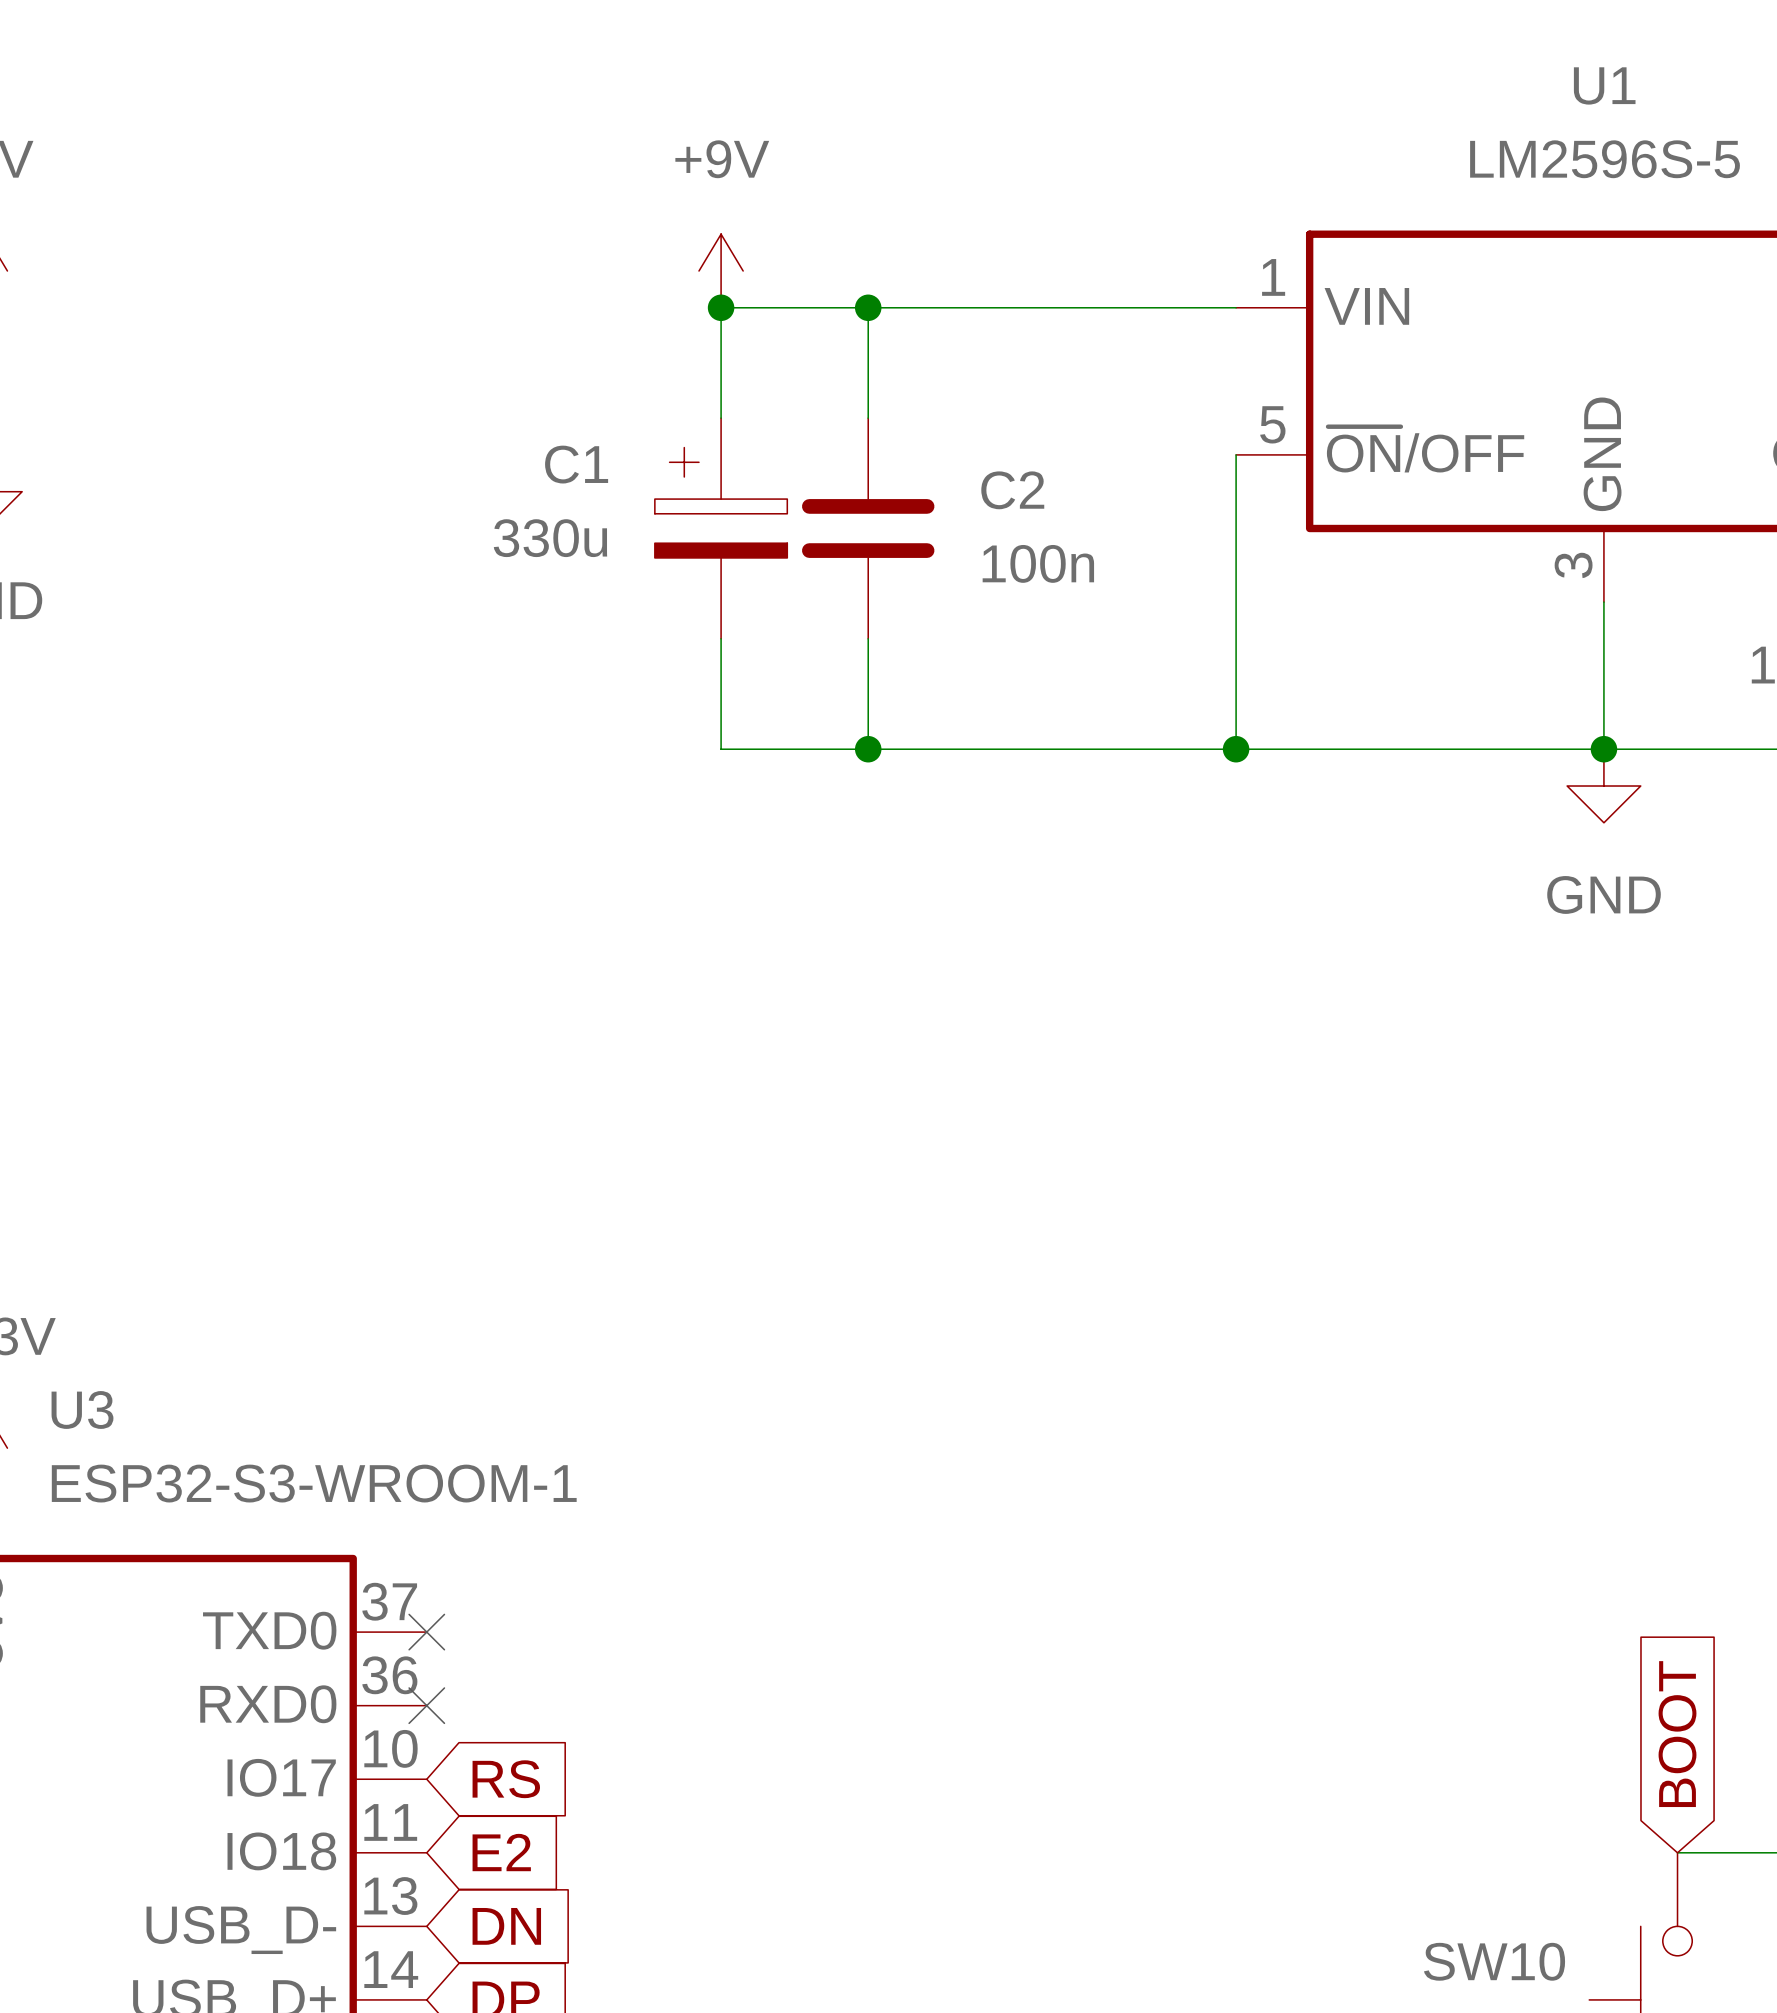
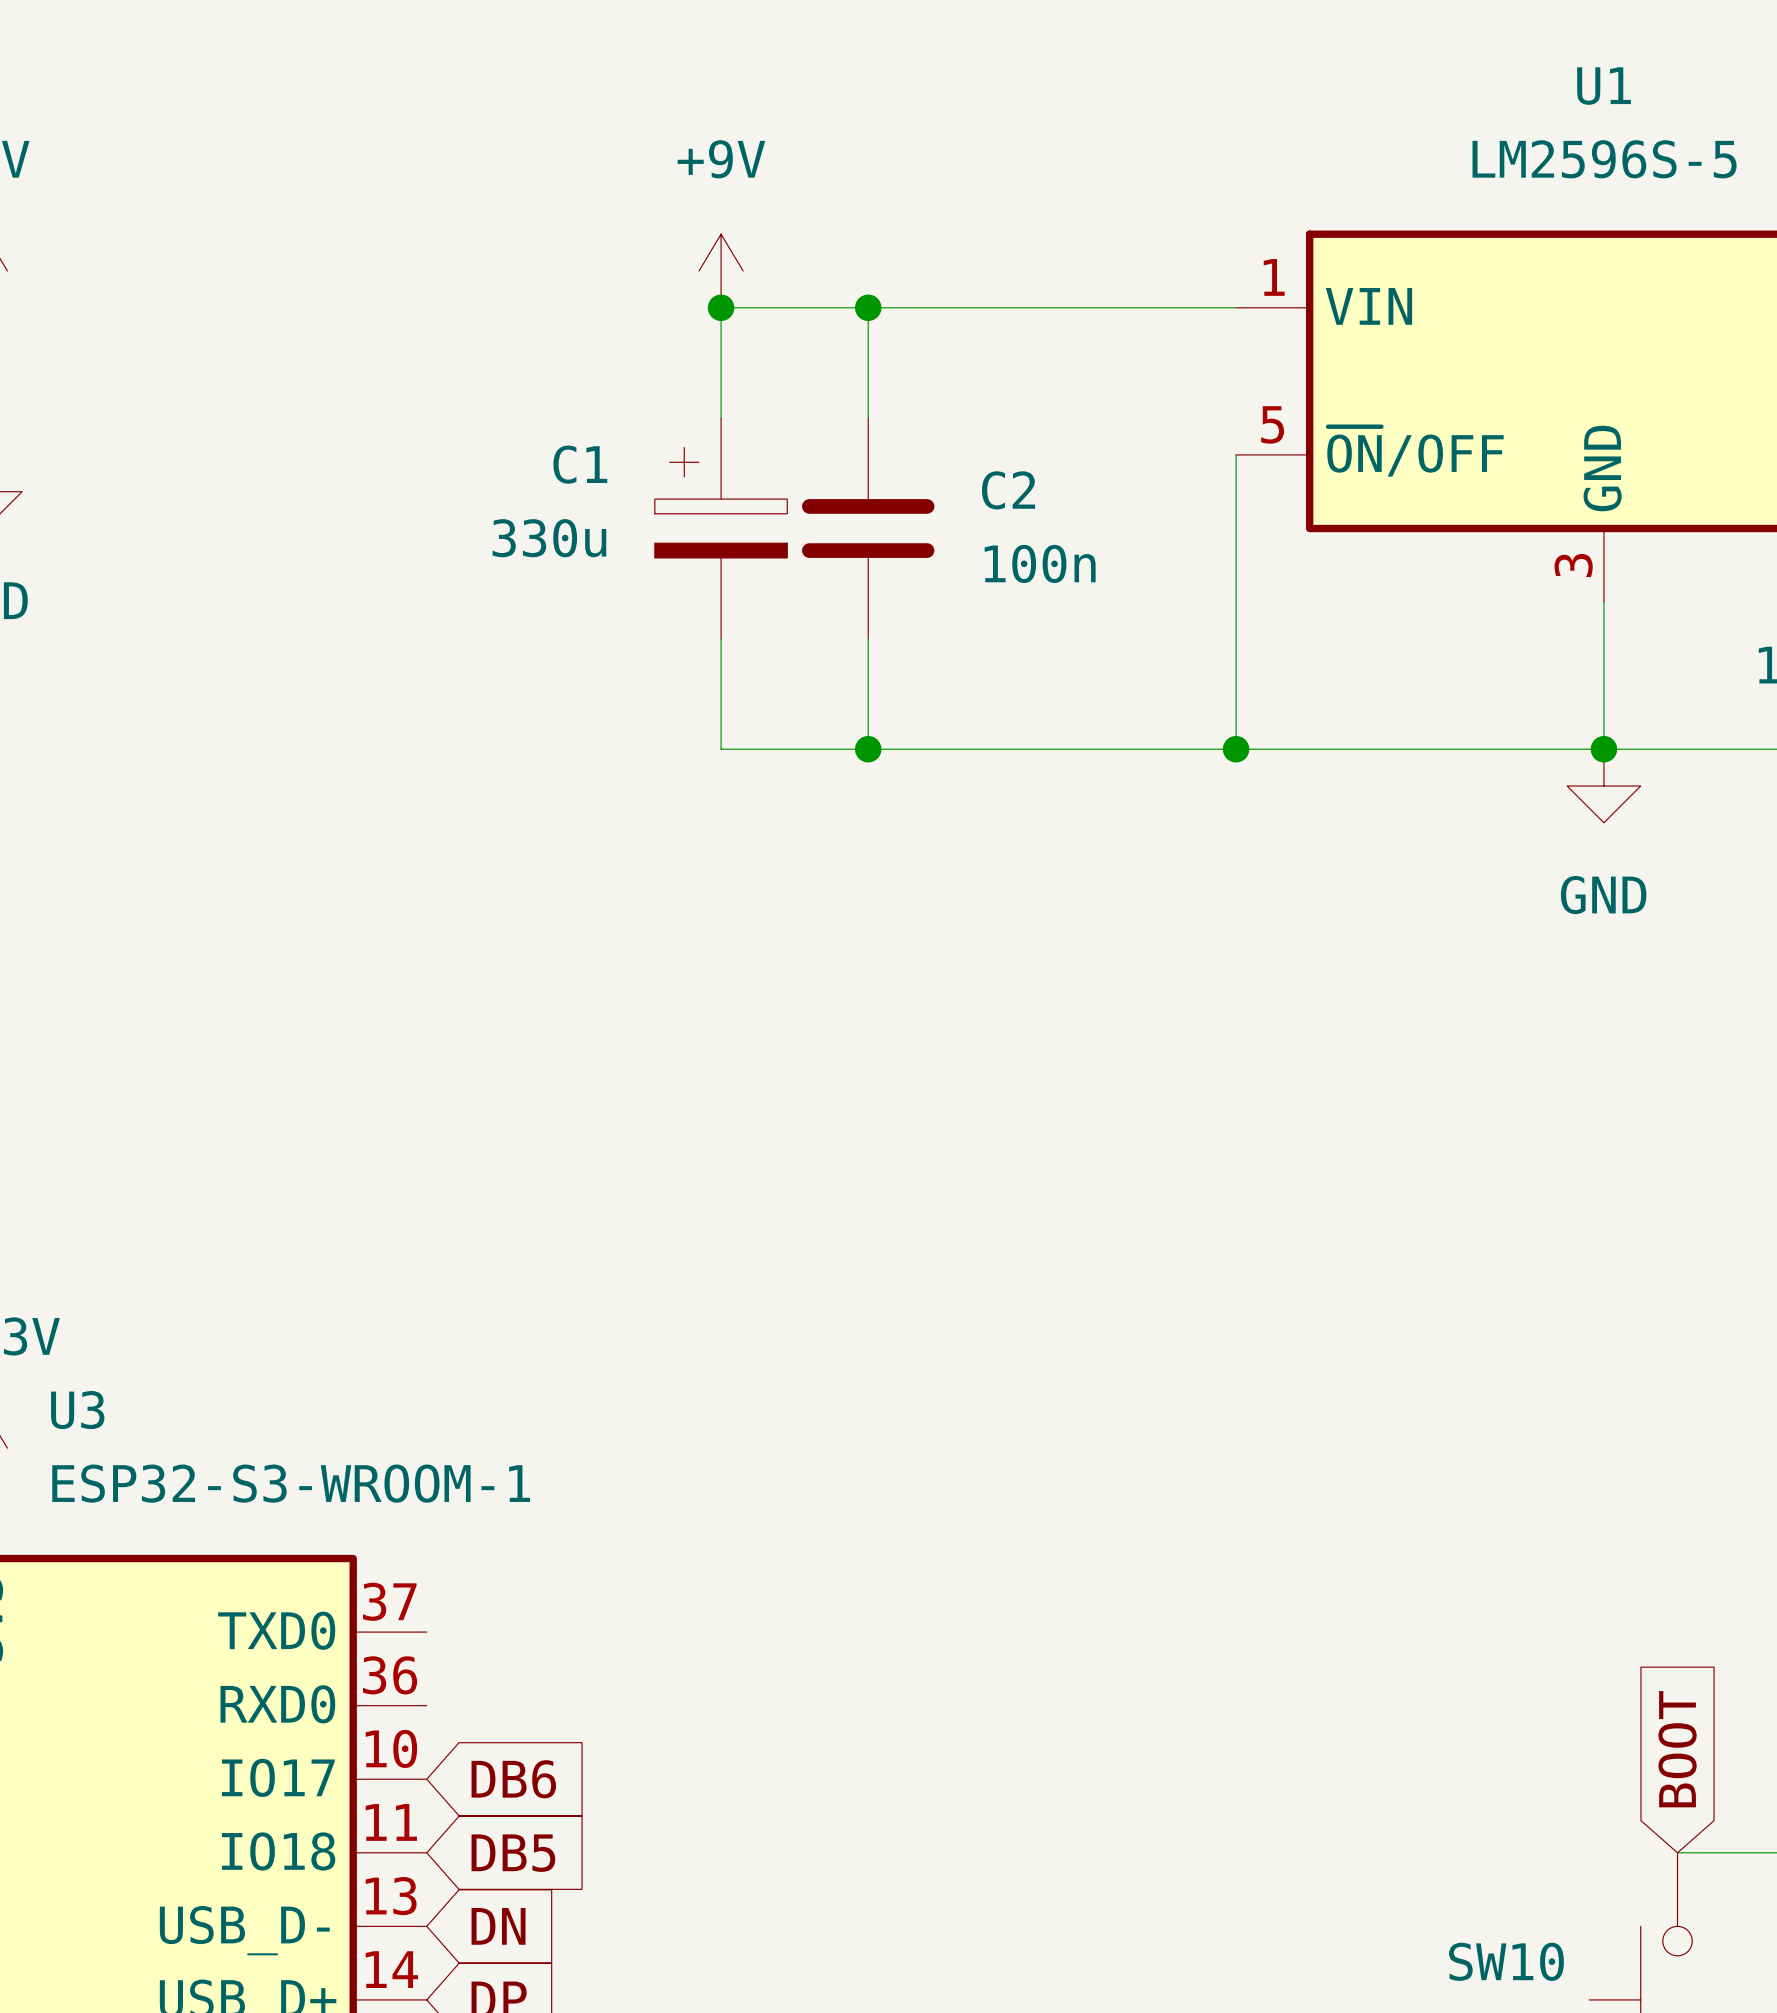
no-connect mark: (426, 1632) -> none
no-connect mark: (426, 1705) -> none
global label: RS (506, 1779) -> DB6 (513, 1779)
global label: E2 (501, 1852) -> DB5 (513, 1853)

